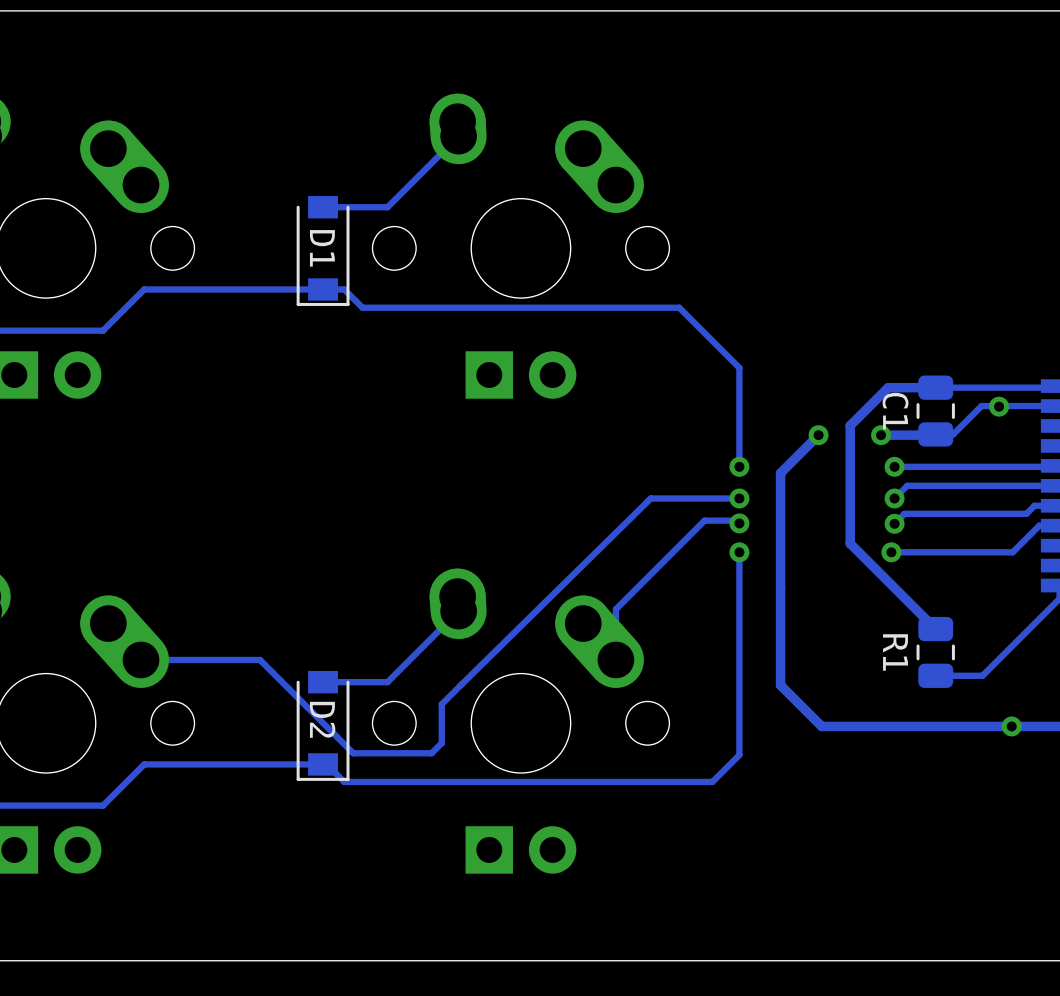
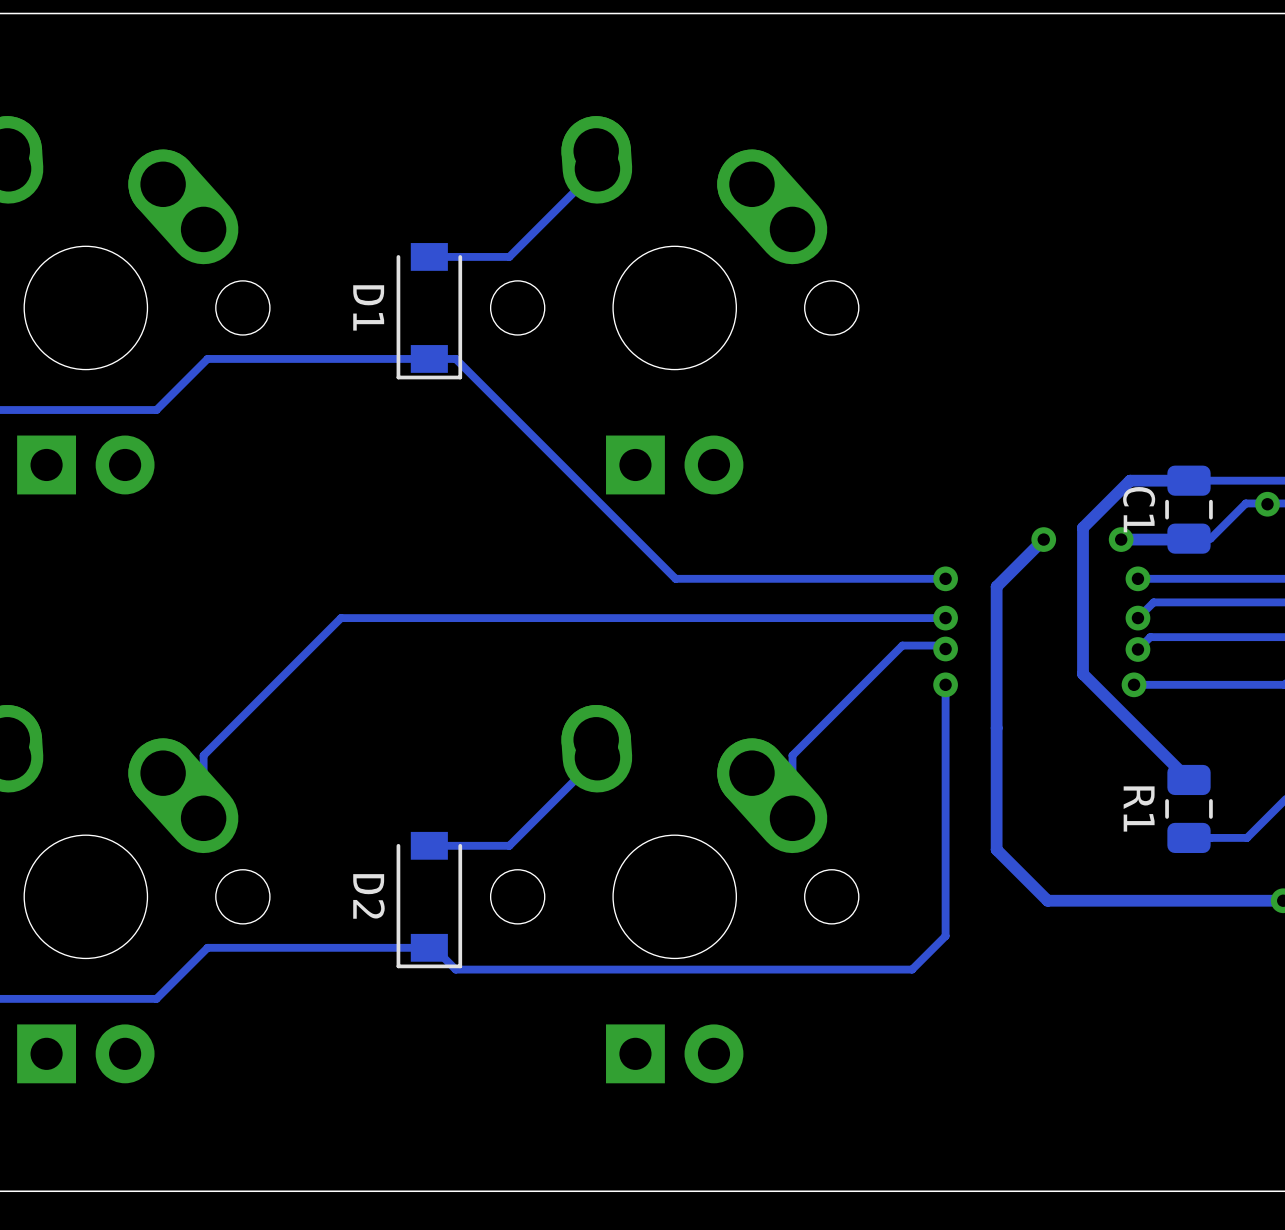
D1 name position: D1 (322, 248) -> D1 (368, 307)
track: (362, 307) (679, 307) (739, 367) (739, 466) -> (478, 381) (675, 578) (945, 578)
track: (650, 498) (441, 704) (441, 743) (431, 753) (353, 753) (260, 659) (141, 659) -> (835, 618) (341, 618) (203, 755) (203, 818)
D2 name position: D2 (322, 719) -> D2 (368, 896)

